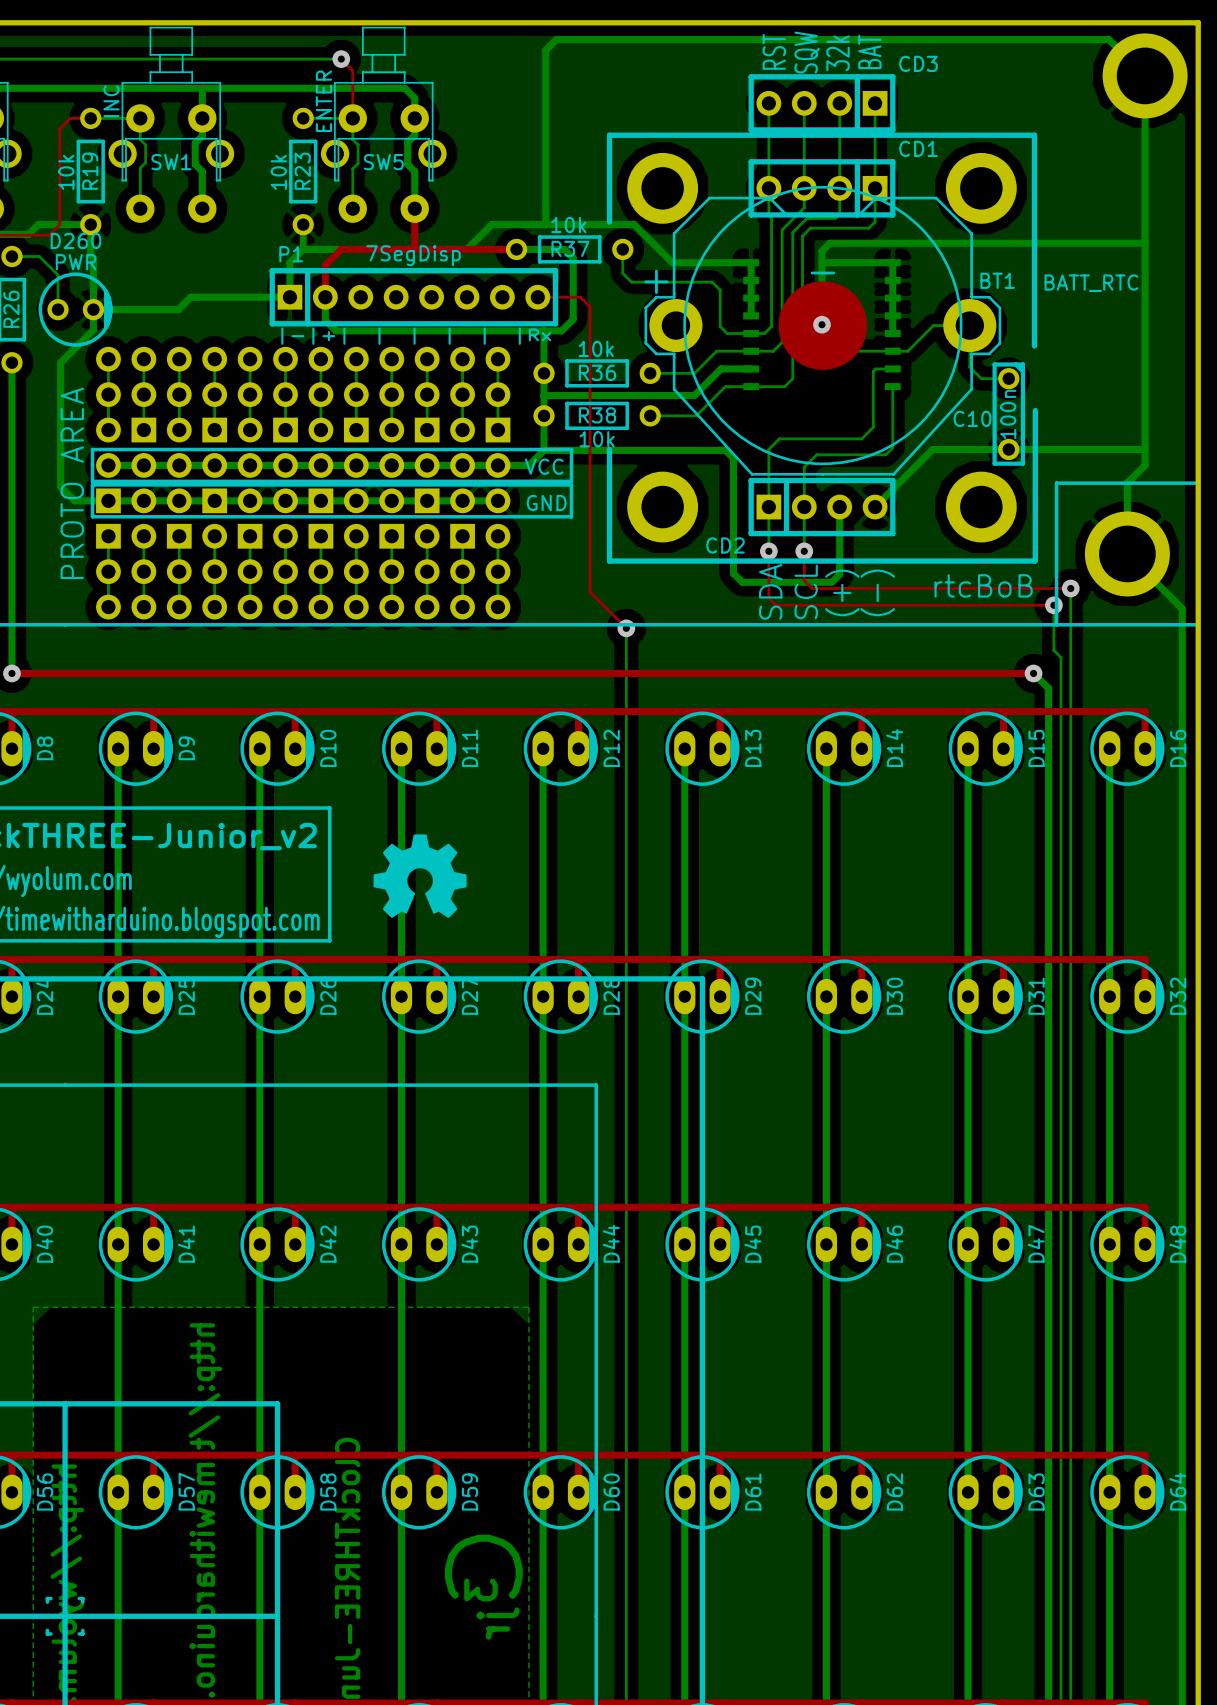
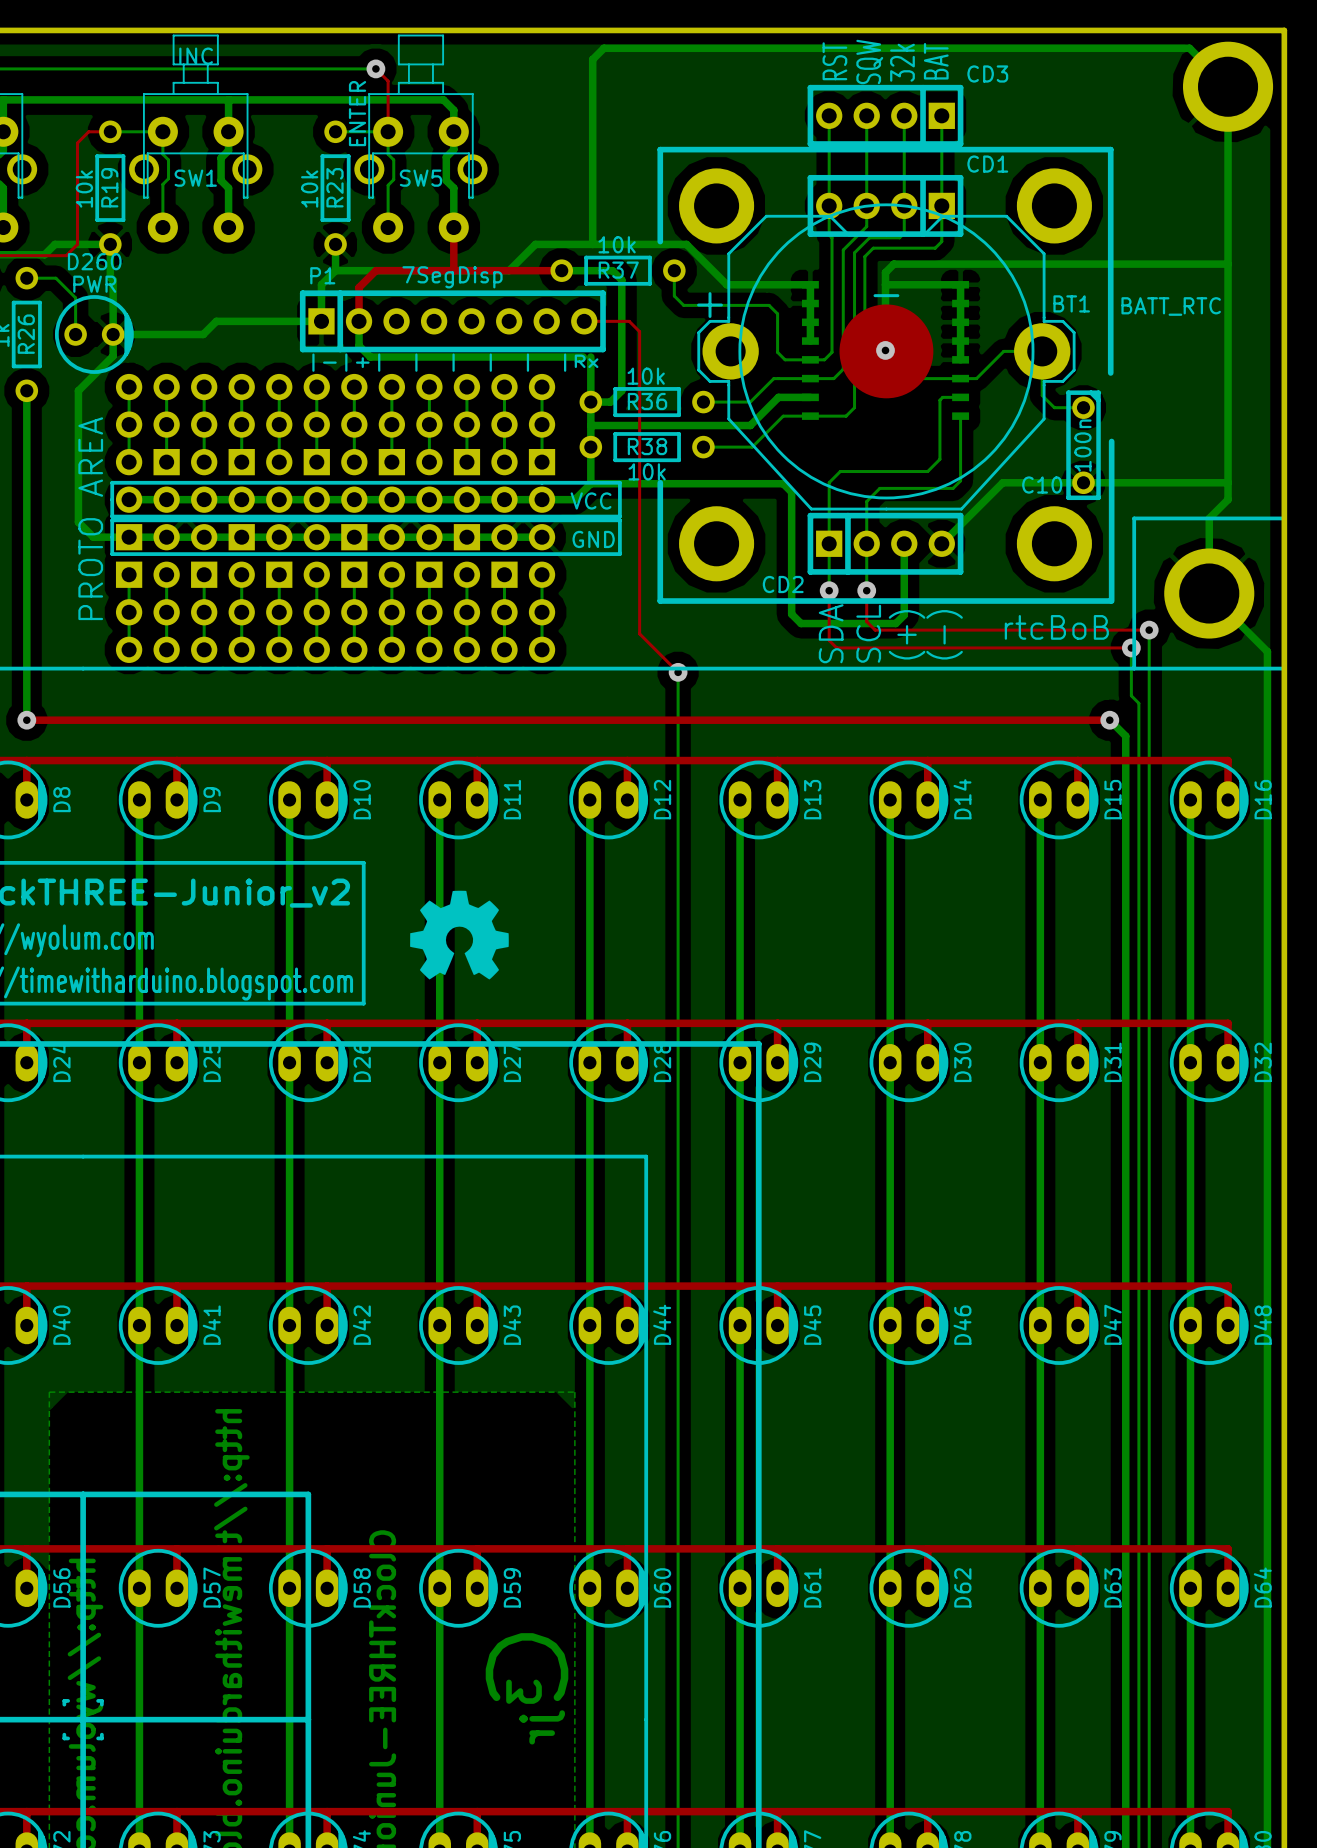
SW1 value rotation: 0° (111, 101) -> 90° clockwise (196, 56)
SW1 value position: INC (111, 101) -> INC (196, 56)
bottom track: (573, 319) (561, 330) (536, 330) -> (621, 344) (621, 390) (610, 402) (590, 402)
C10 name position: C10 (972, 418) -> C10 (1042, 485)

